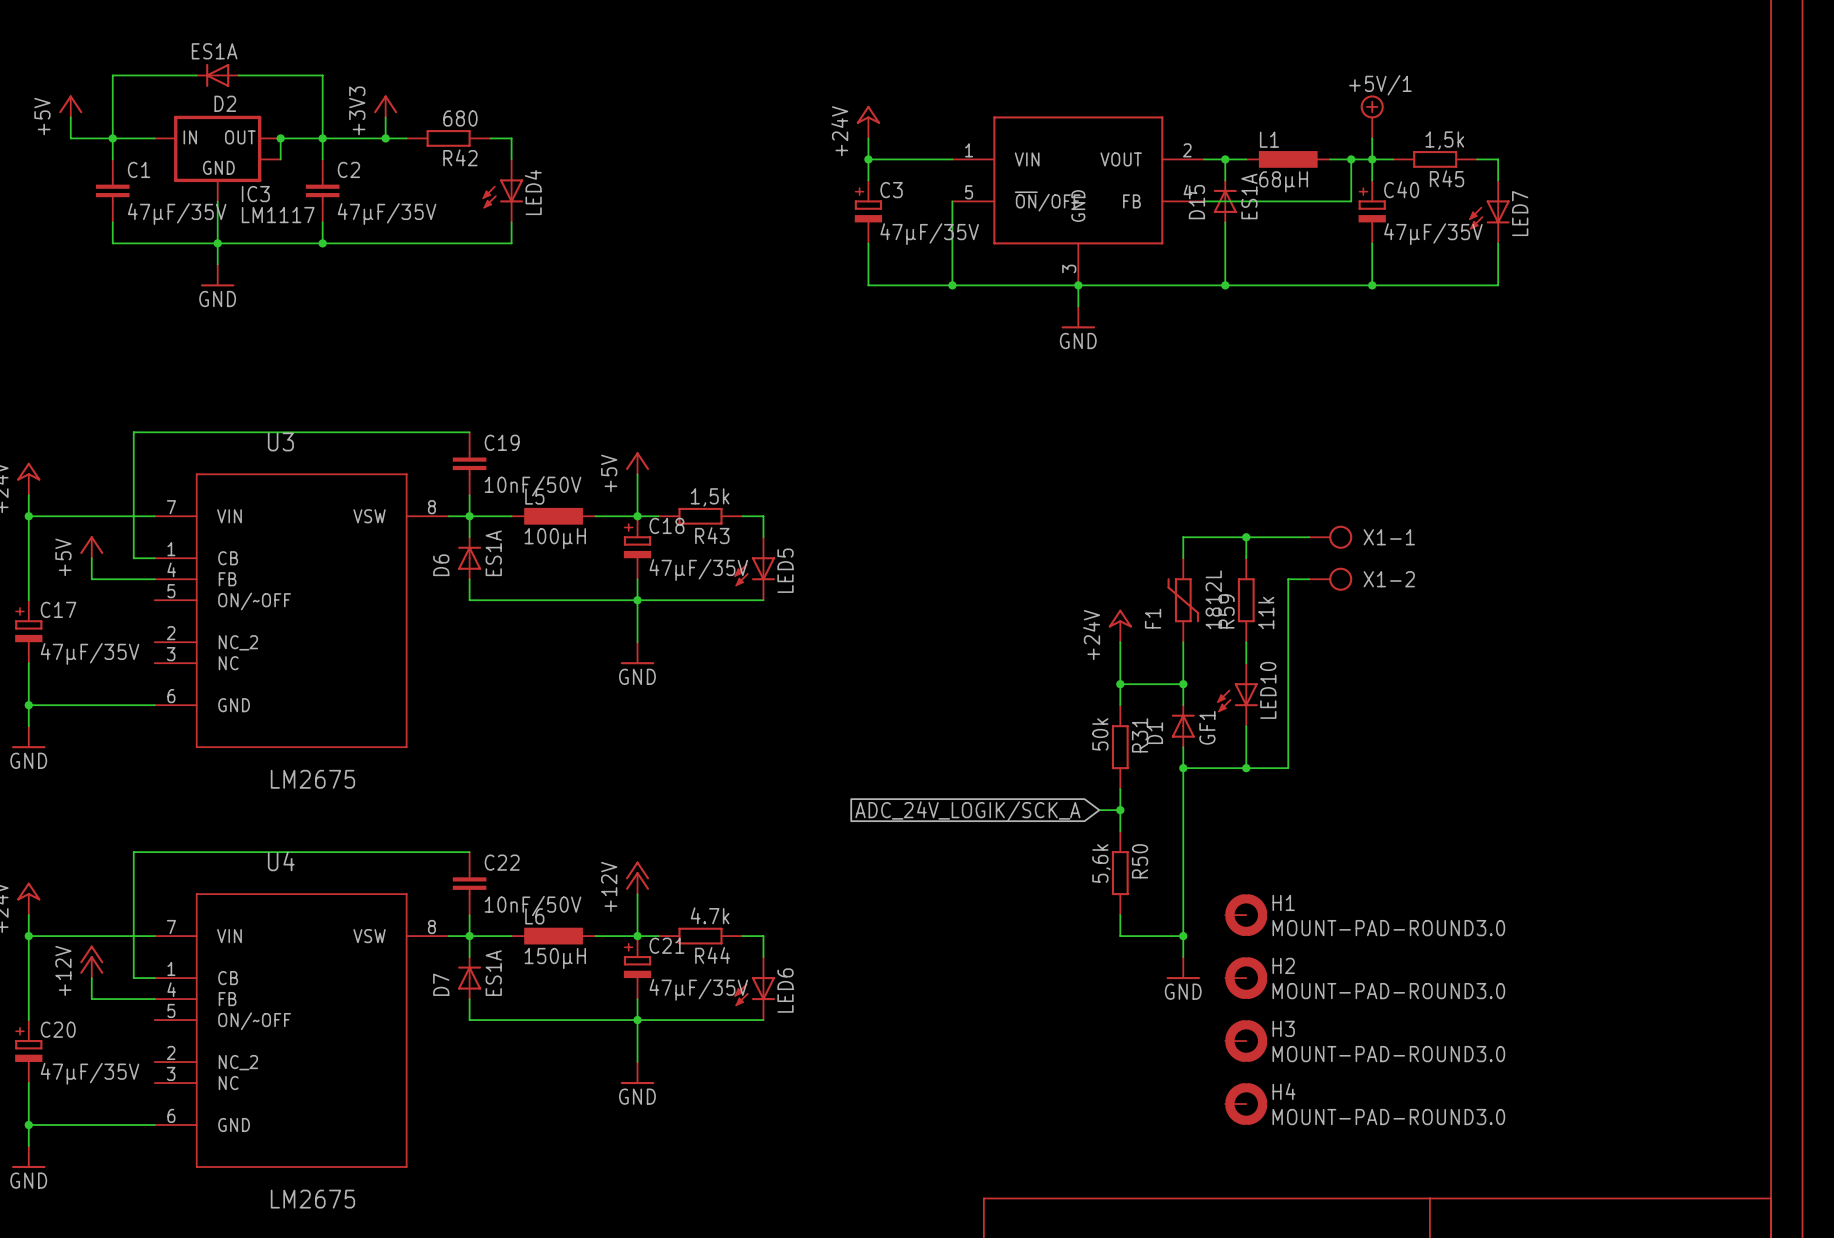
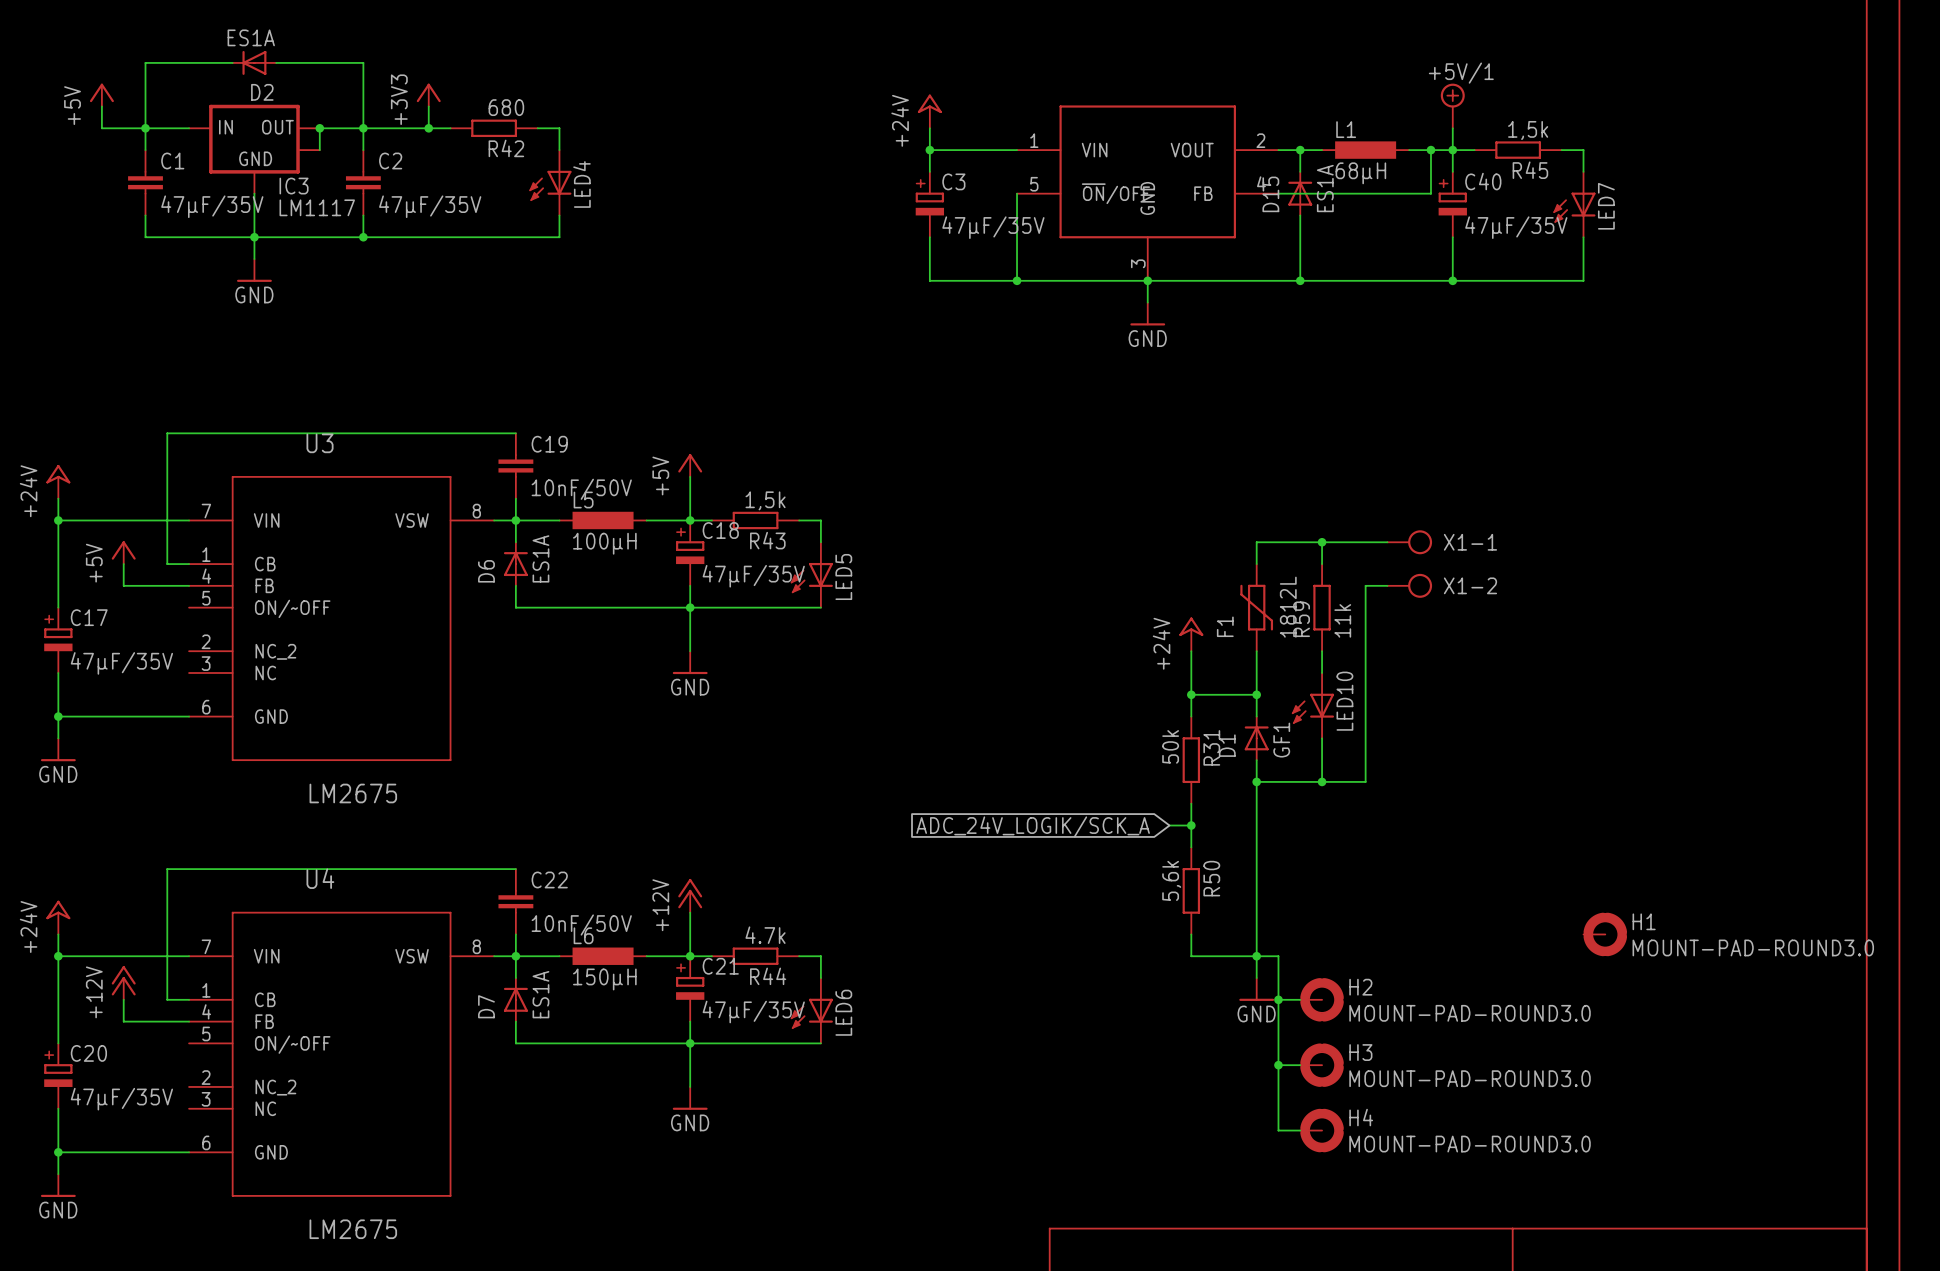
H1 position: (1246, 915) -> (1605, 934)
wire: none -> (1256, 956) (1278, 956) (1278, 1130) (1300, 1130)
wire: none -> (1278, 999) (1300, 999)
junction: none -> (1278, 999)
wire: none -> (1278, 1065) (1300, 1065)
junction: none -> (1278, 1065)

